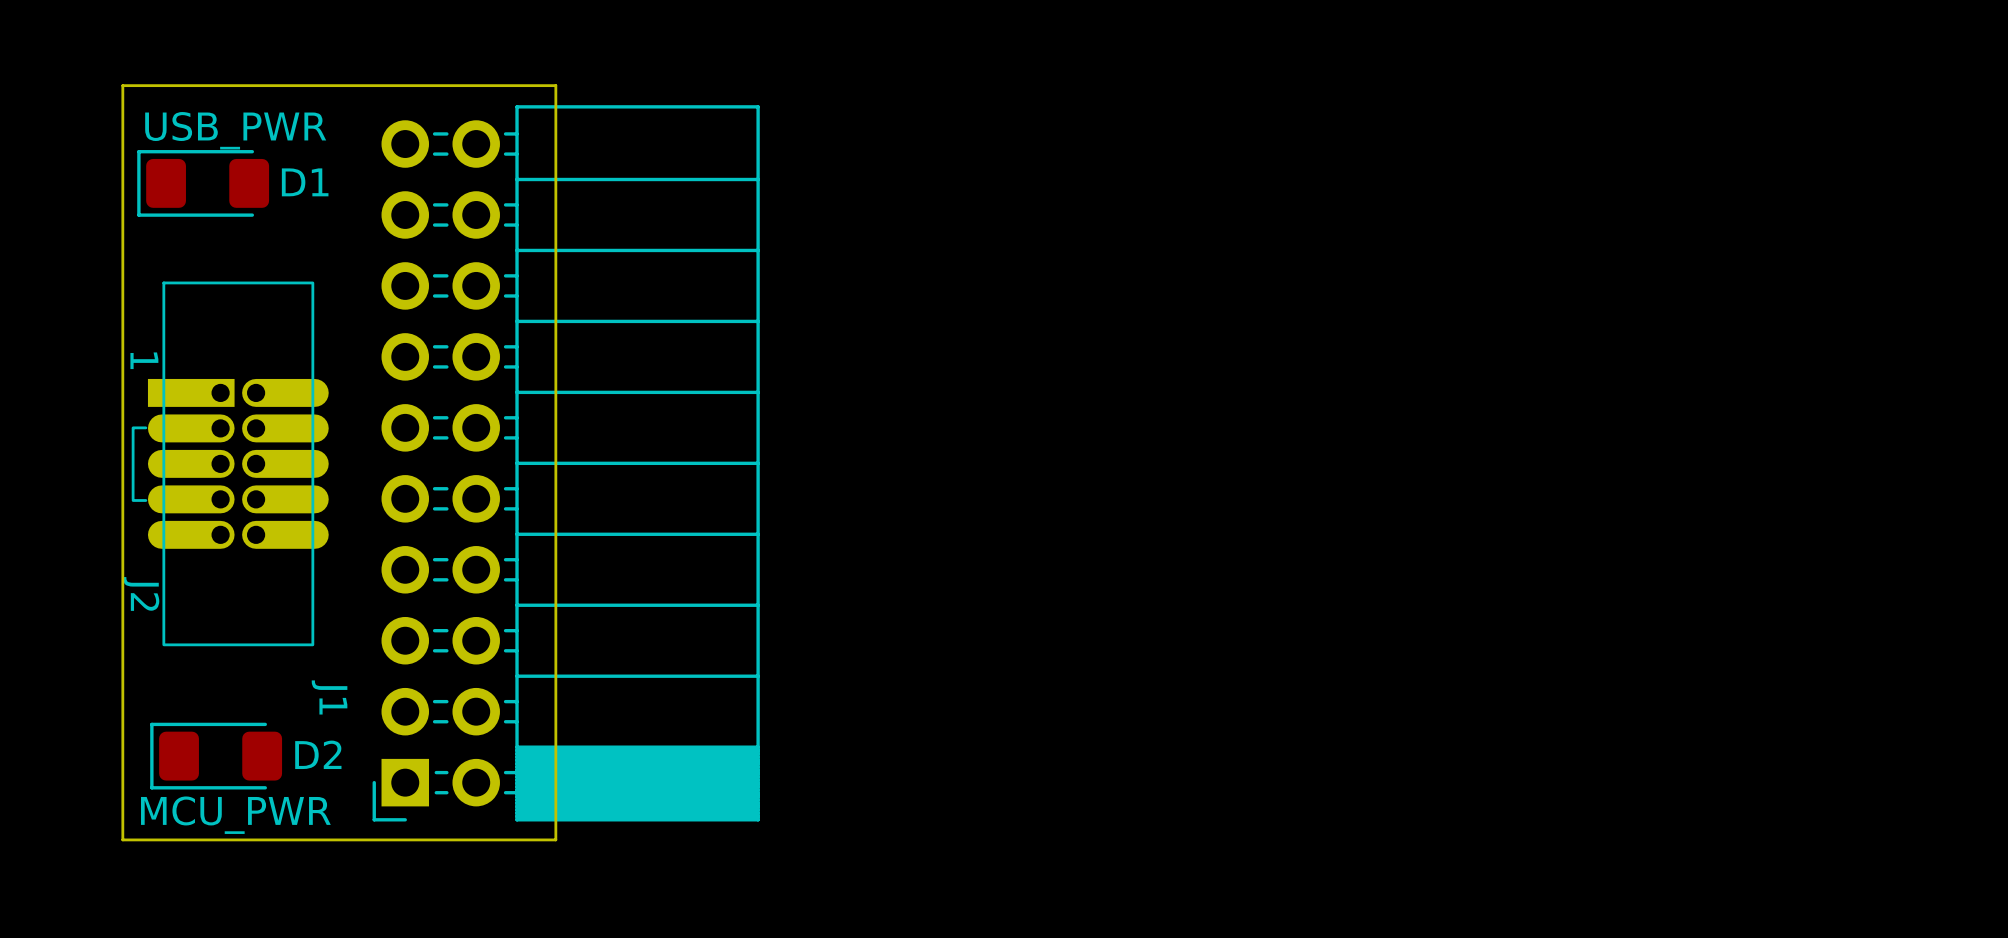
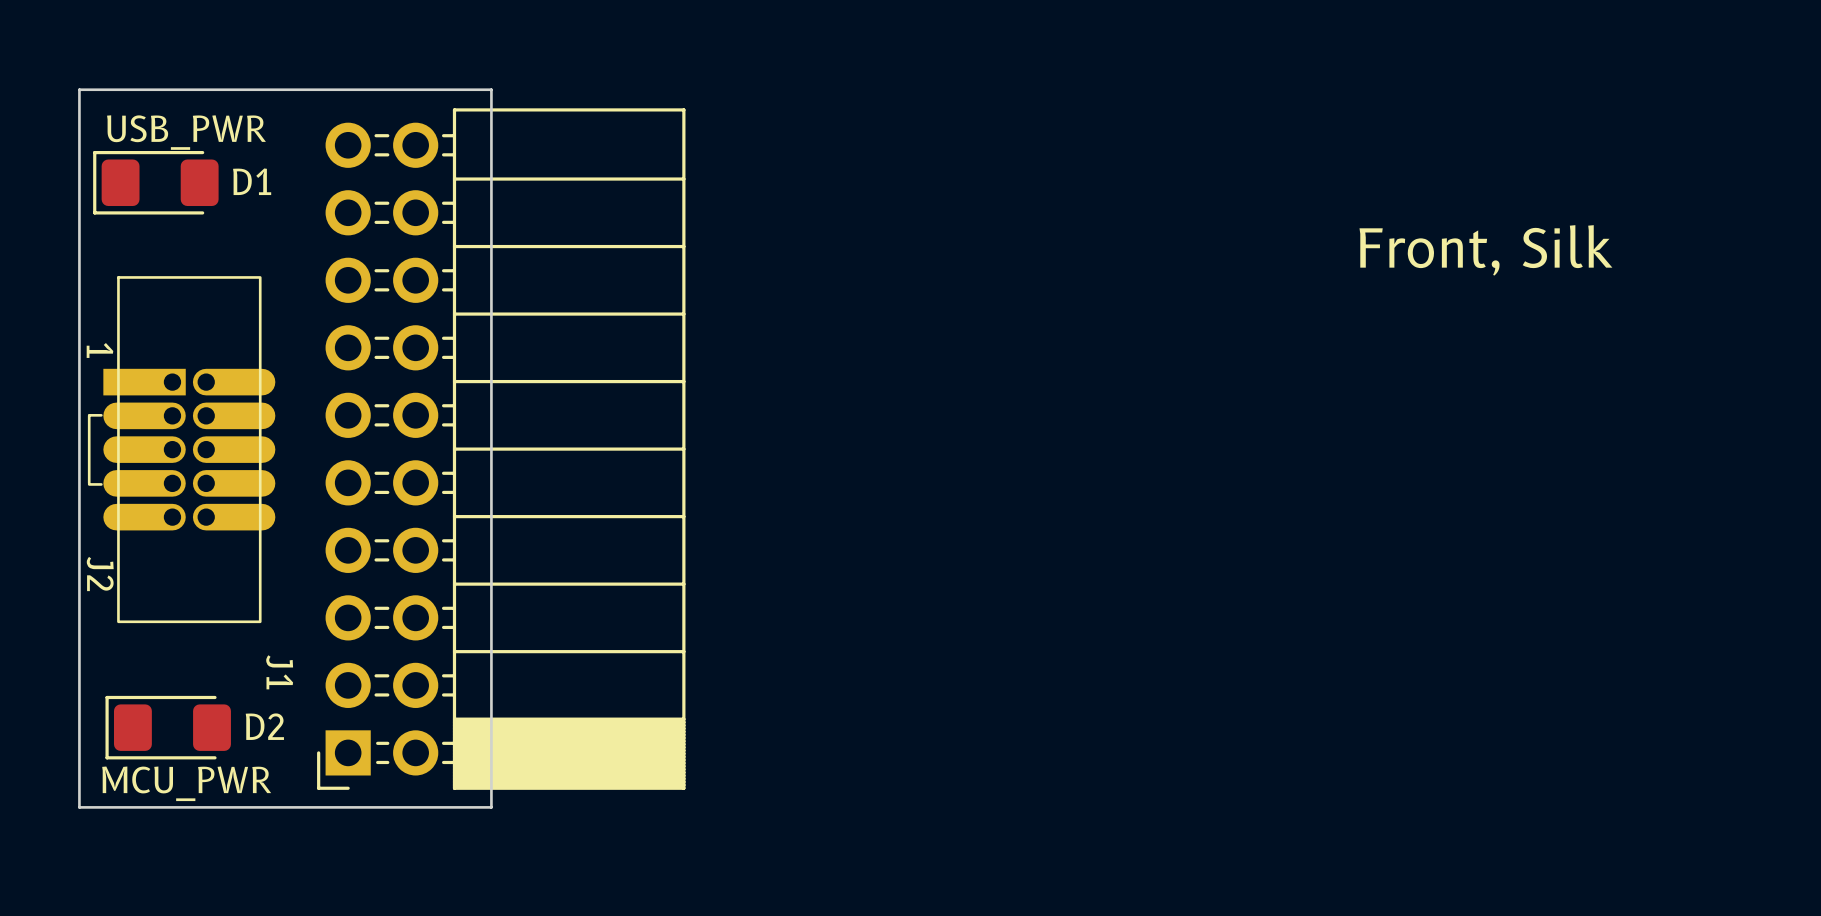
text: none -> Front, Silk (1485, 250)

